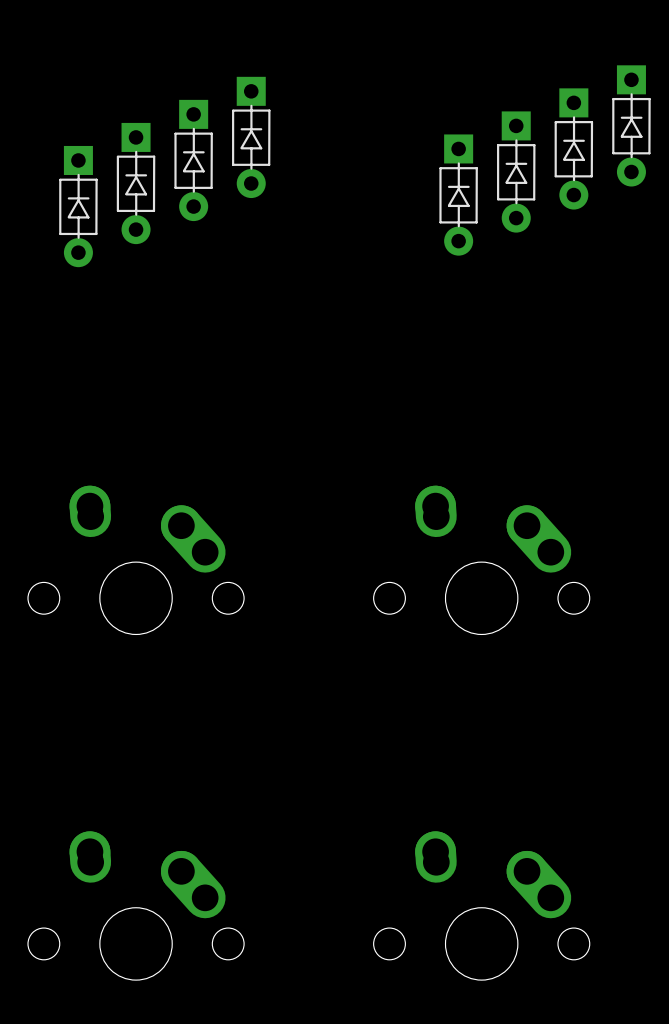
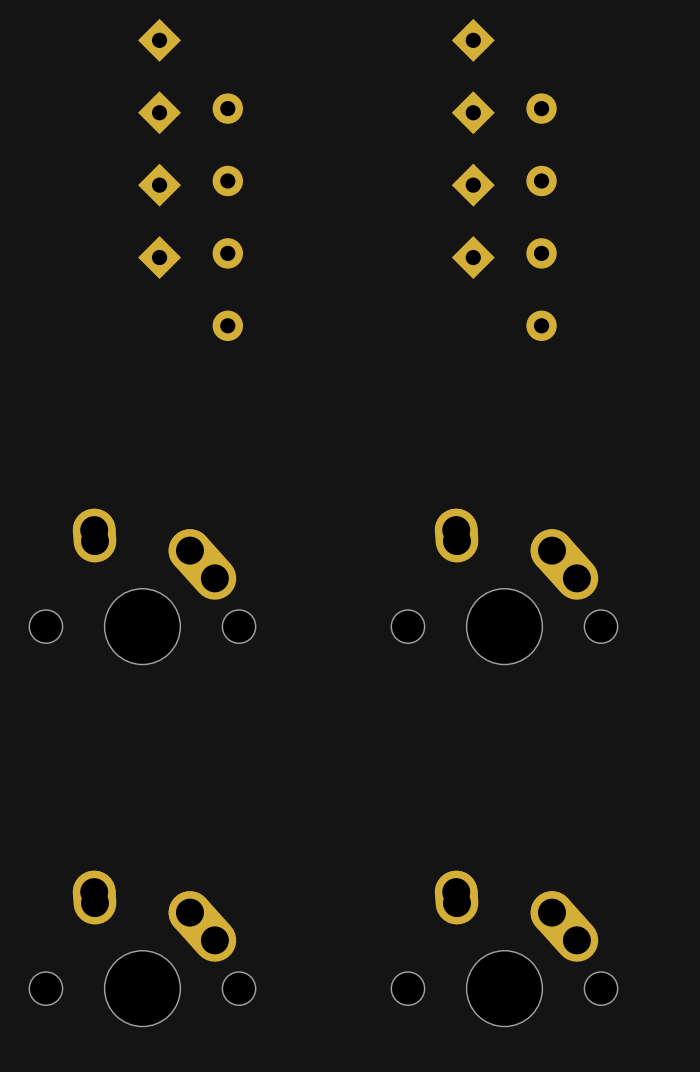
part side: bottom (631, 125) -> top (504, 71)
part side: bottom (251, 137) -> top (190, 71)
part side: bottom (573, 148) -> top (504, 143)
part side: bottom (193, 160) -> top (190, 143)
part side: bottom (516, 172) -> top (504, 216)
part side: bottom (136, 183) -> top (190, 288)
part side: bottom (458, 195) -> top (504, 288)
part side: bottom (78, 206) -> top (190, 216)

